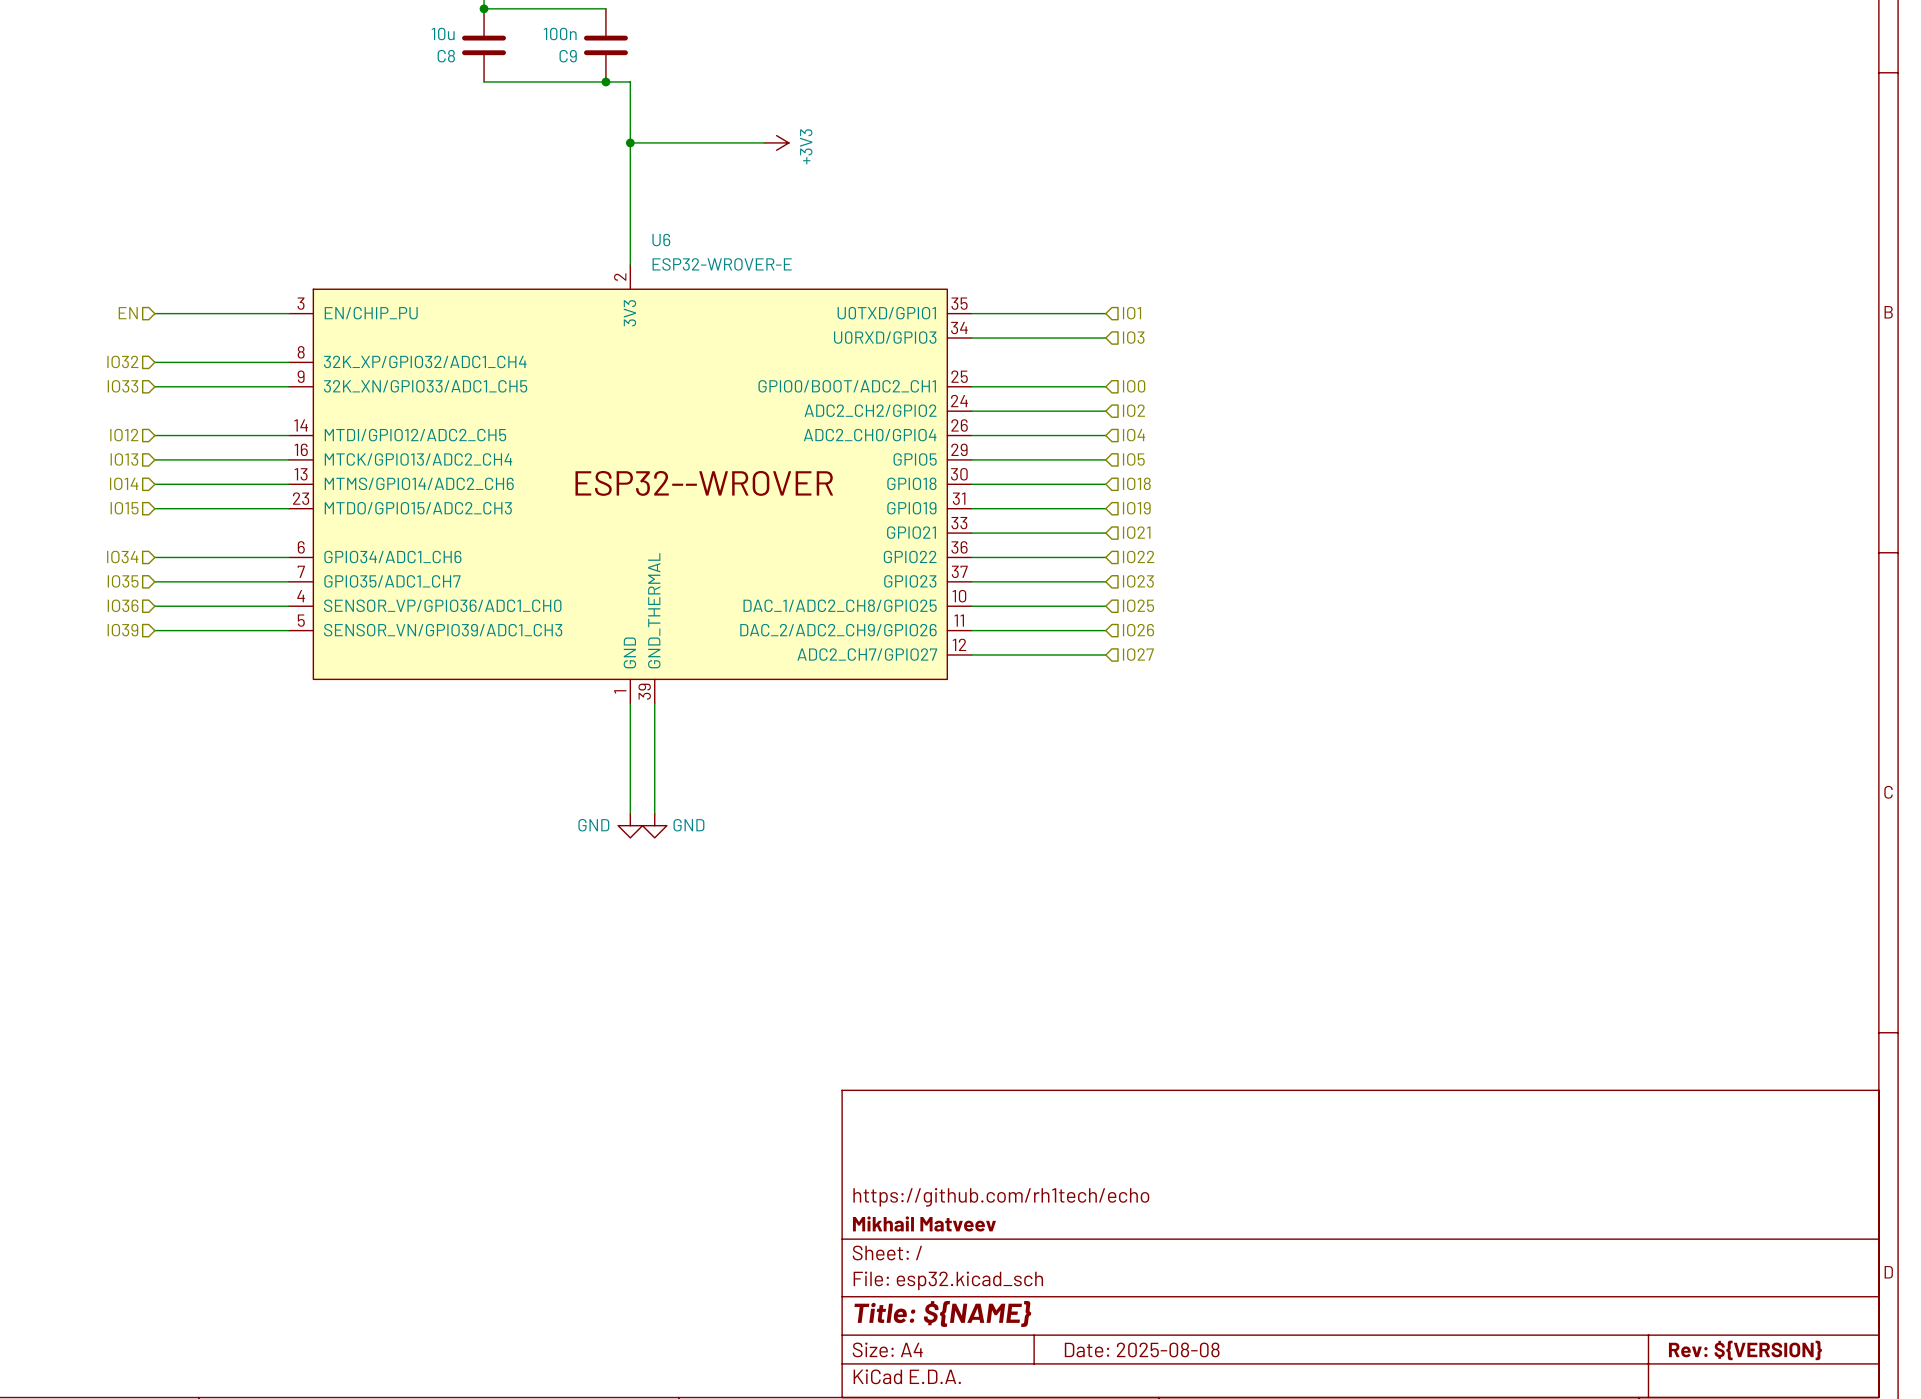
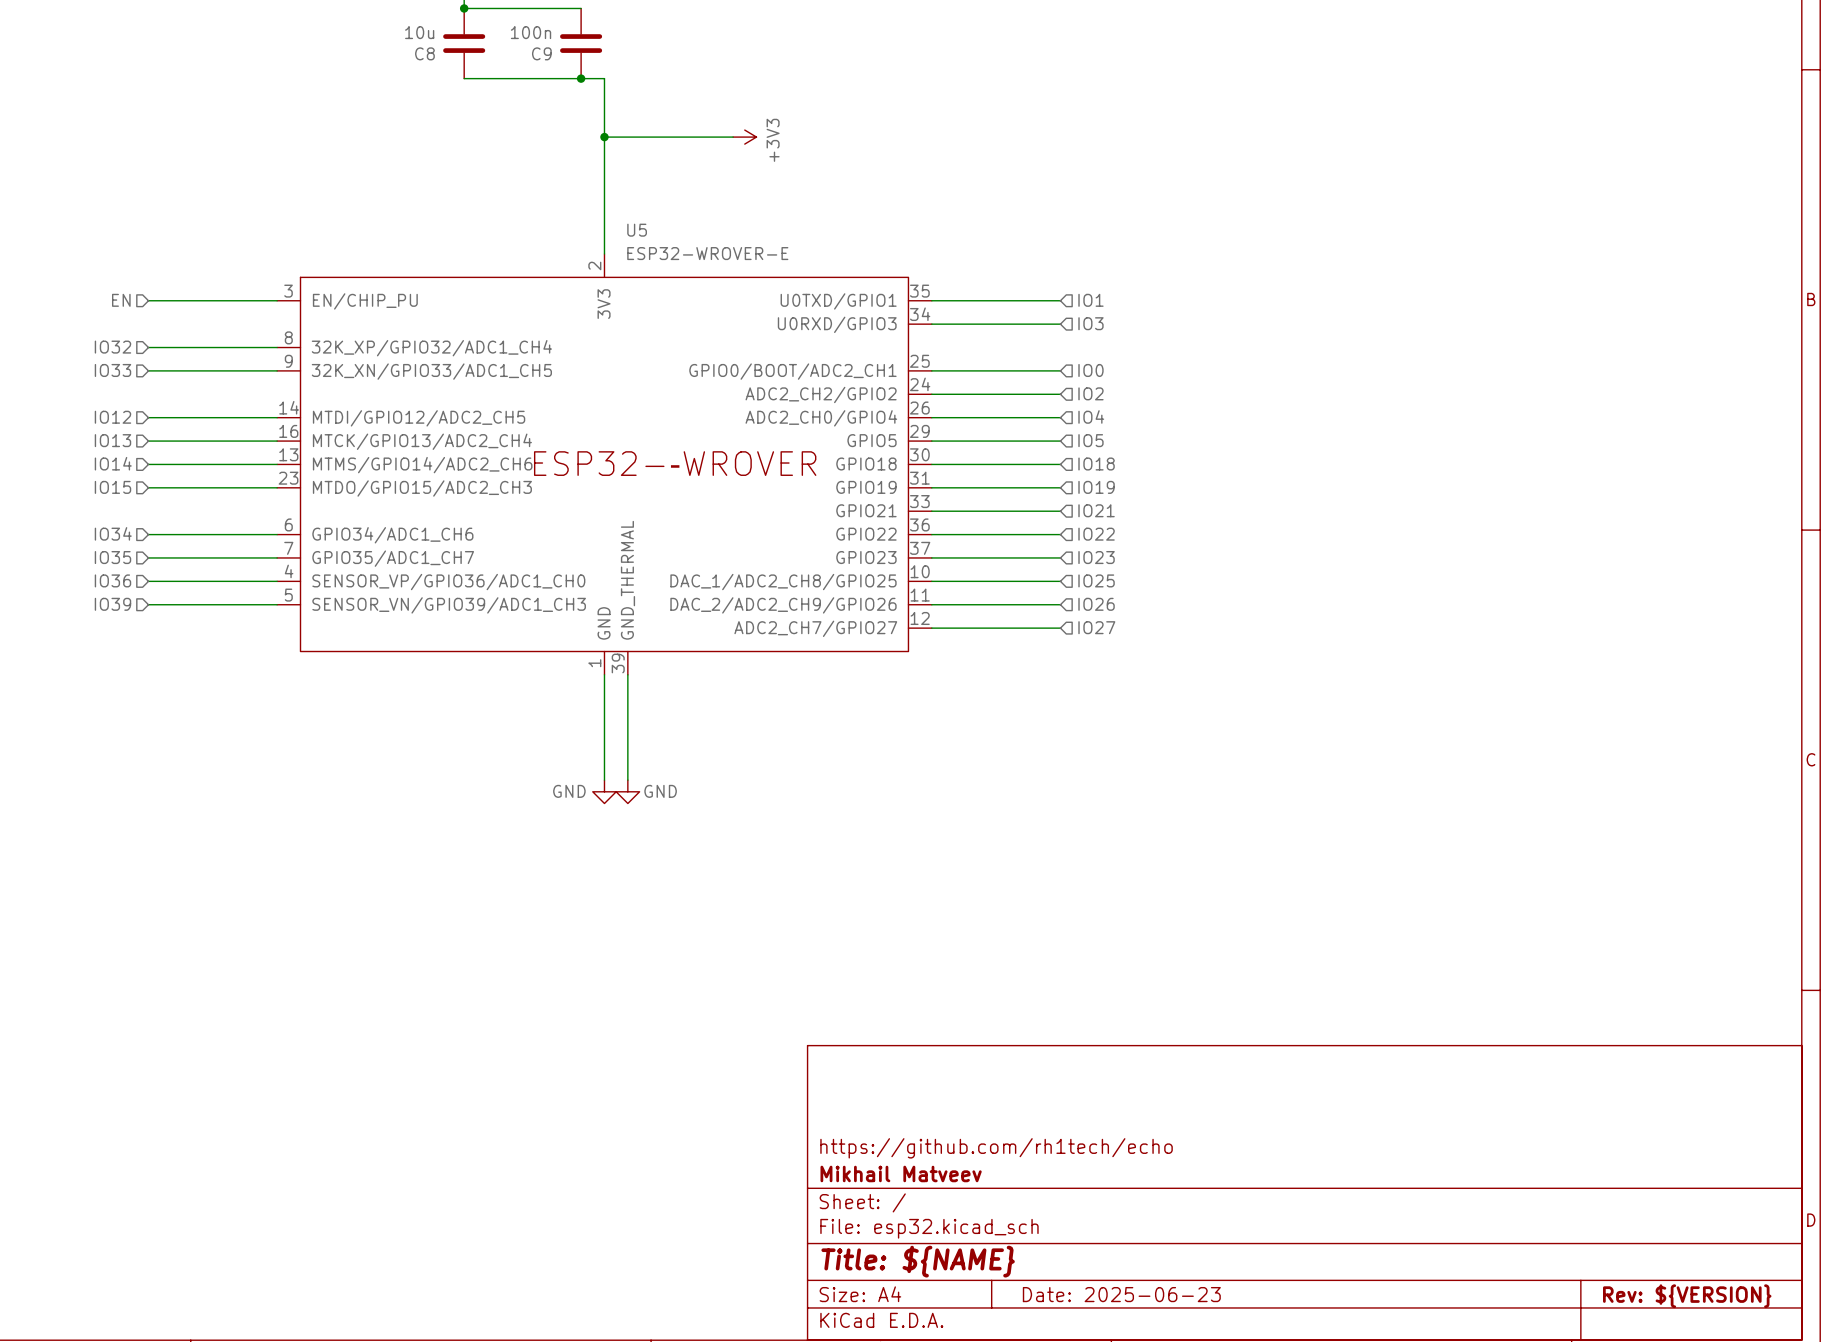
U6 name: U6 (661, 240) -> U5 (637, 230)
title block: Date: 2025-08-08 (1142, 1349) -> Date: 2025-06-23 (1121, 1294)

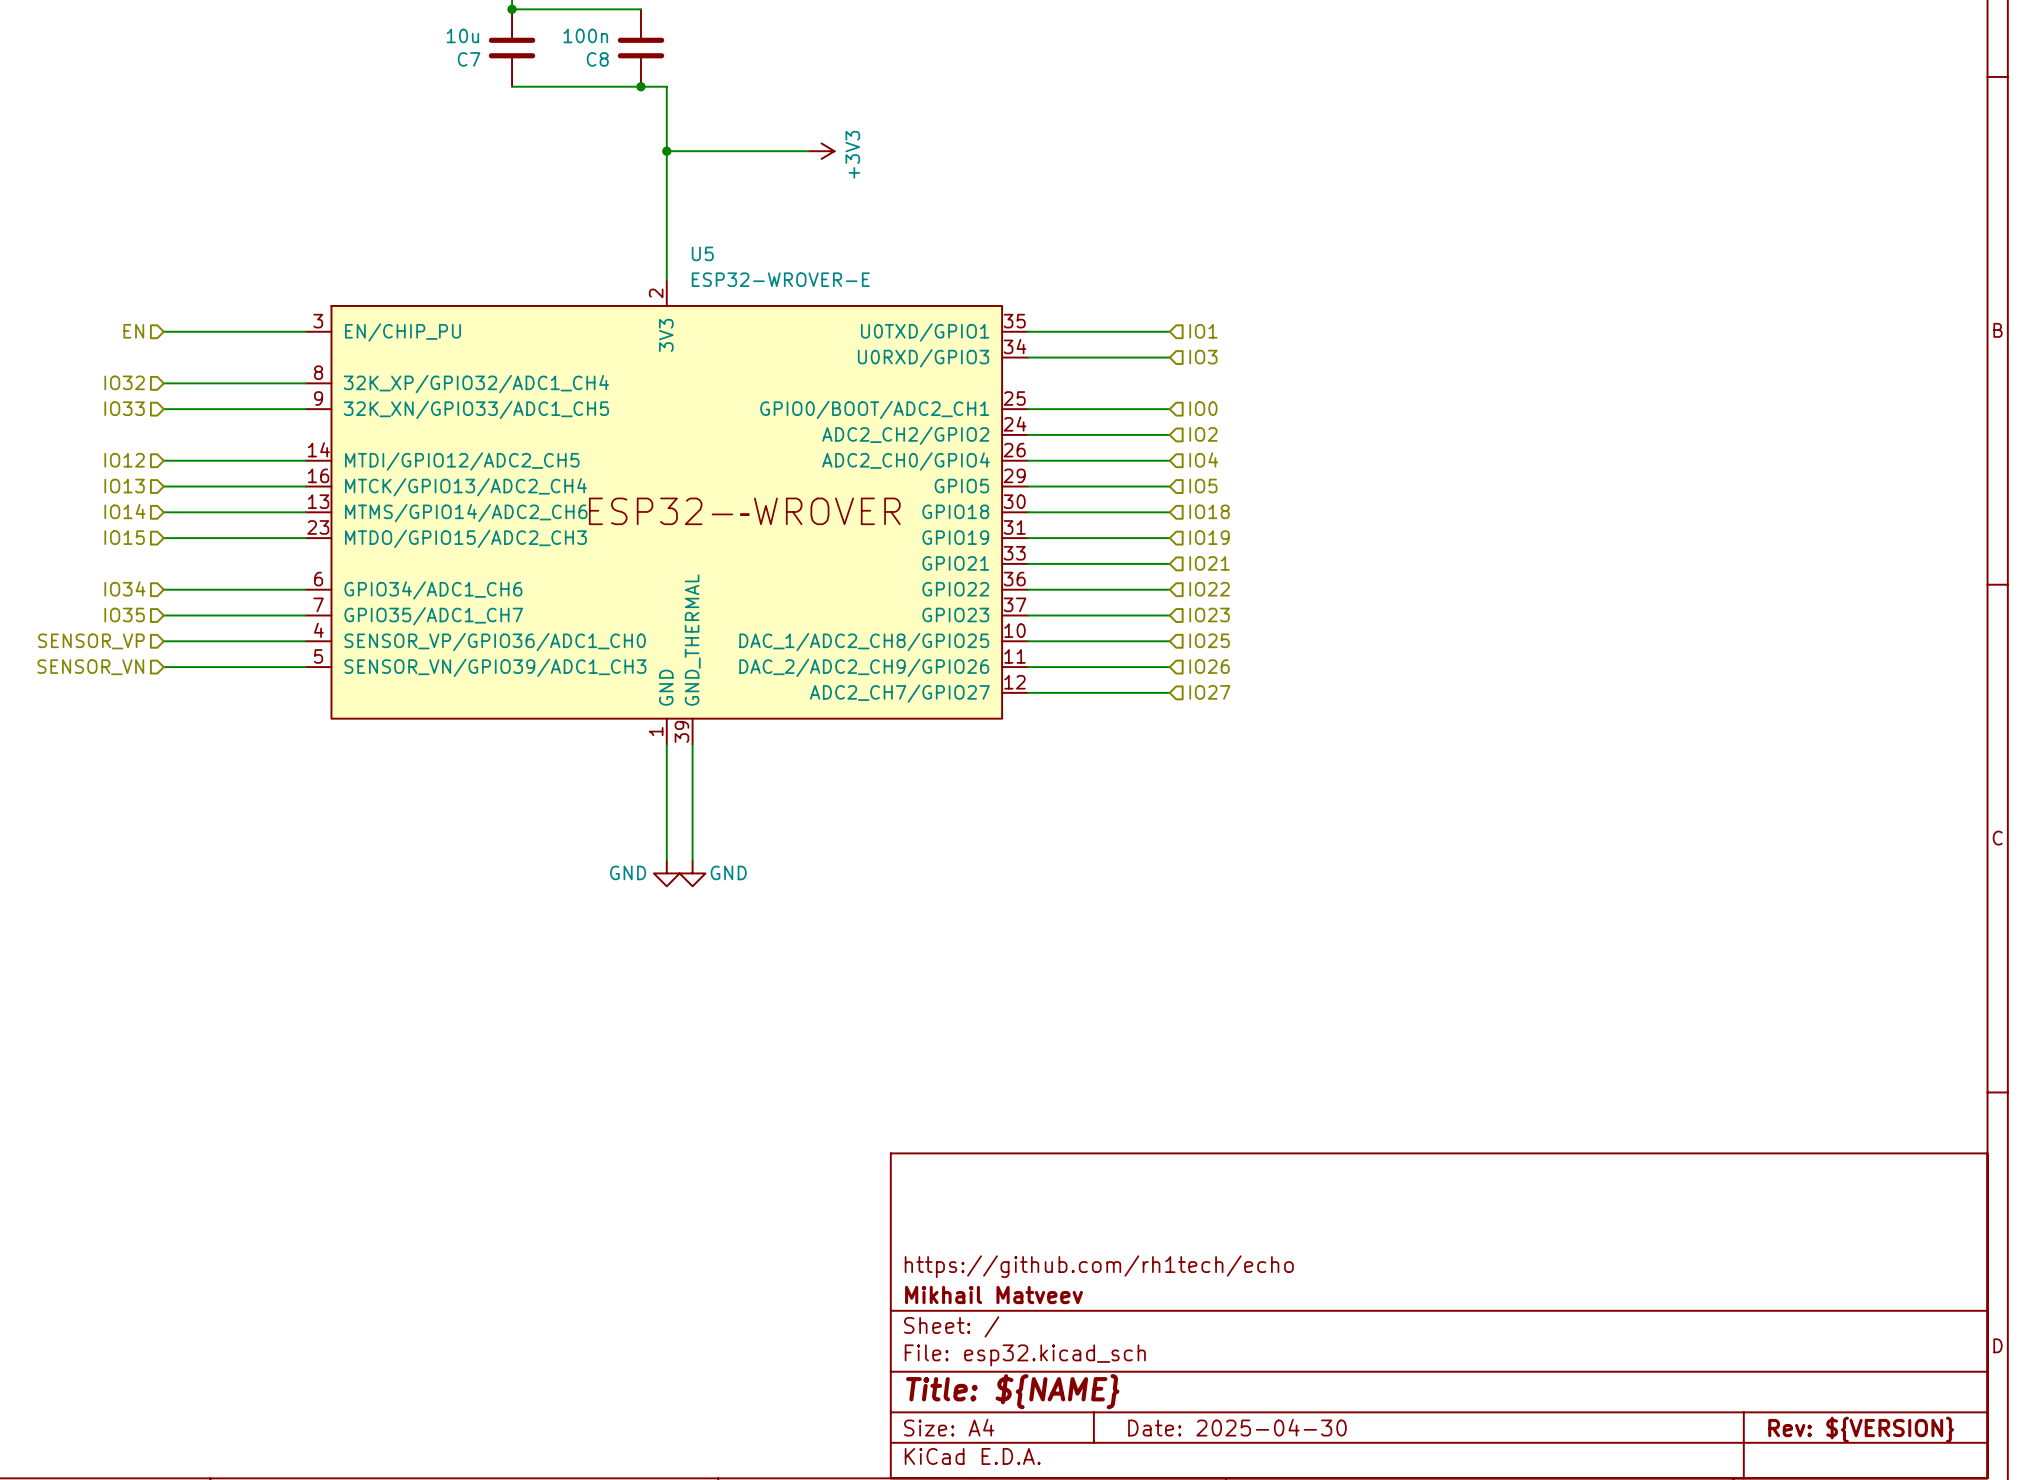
C8 name: C8 (424, 53) -> C7 (469, 59)
C9 name: C9 (541, 53) -> C8 (597, 59)
hierarchical label: IO36 (112, 580) -> SENSOR_VP (91, 641)
hierarchical label: IO39 (112, 604) -> SENSOR_VN (90, 667)
title block: Date: 2025-06-23 (1121, 1294) -> Date: 2025-04-30 (1237, 1427)

